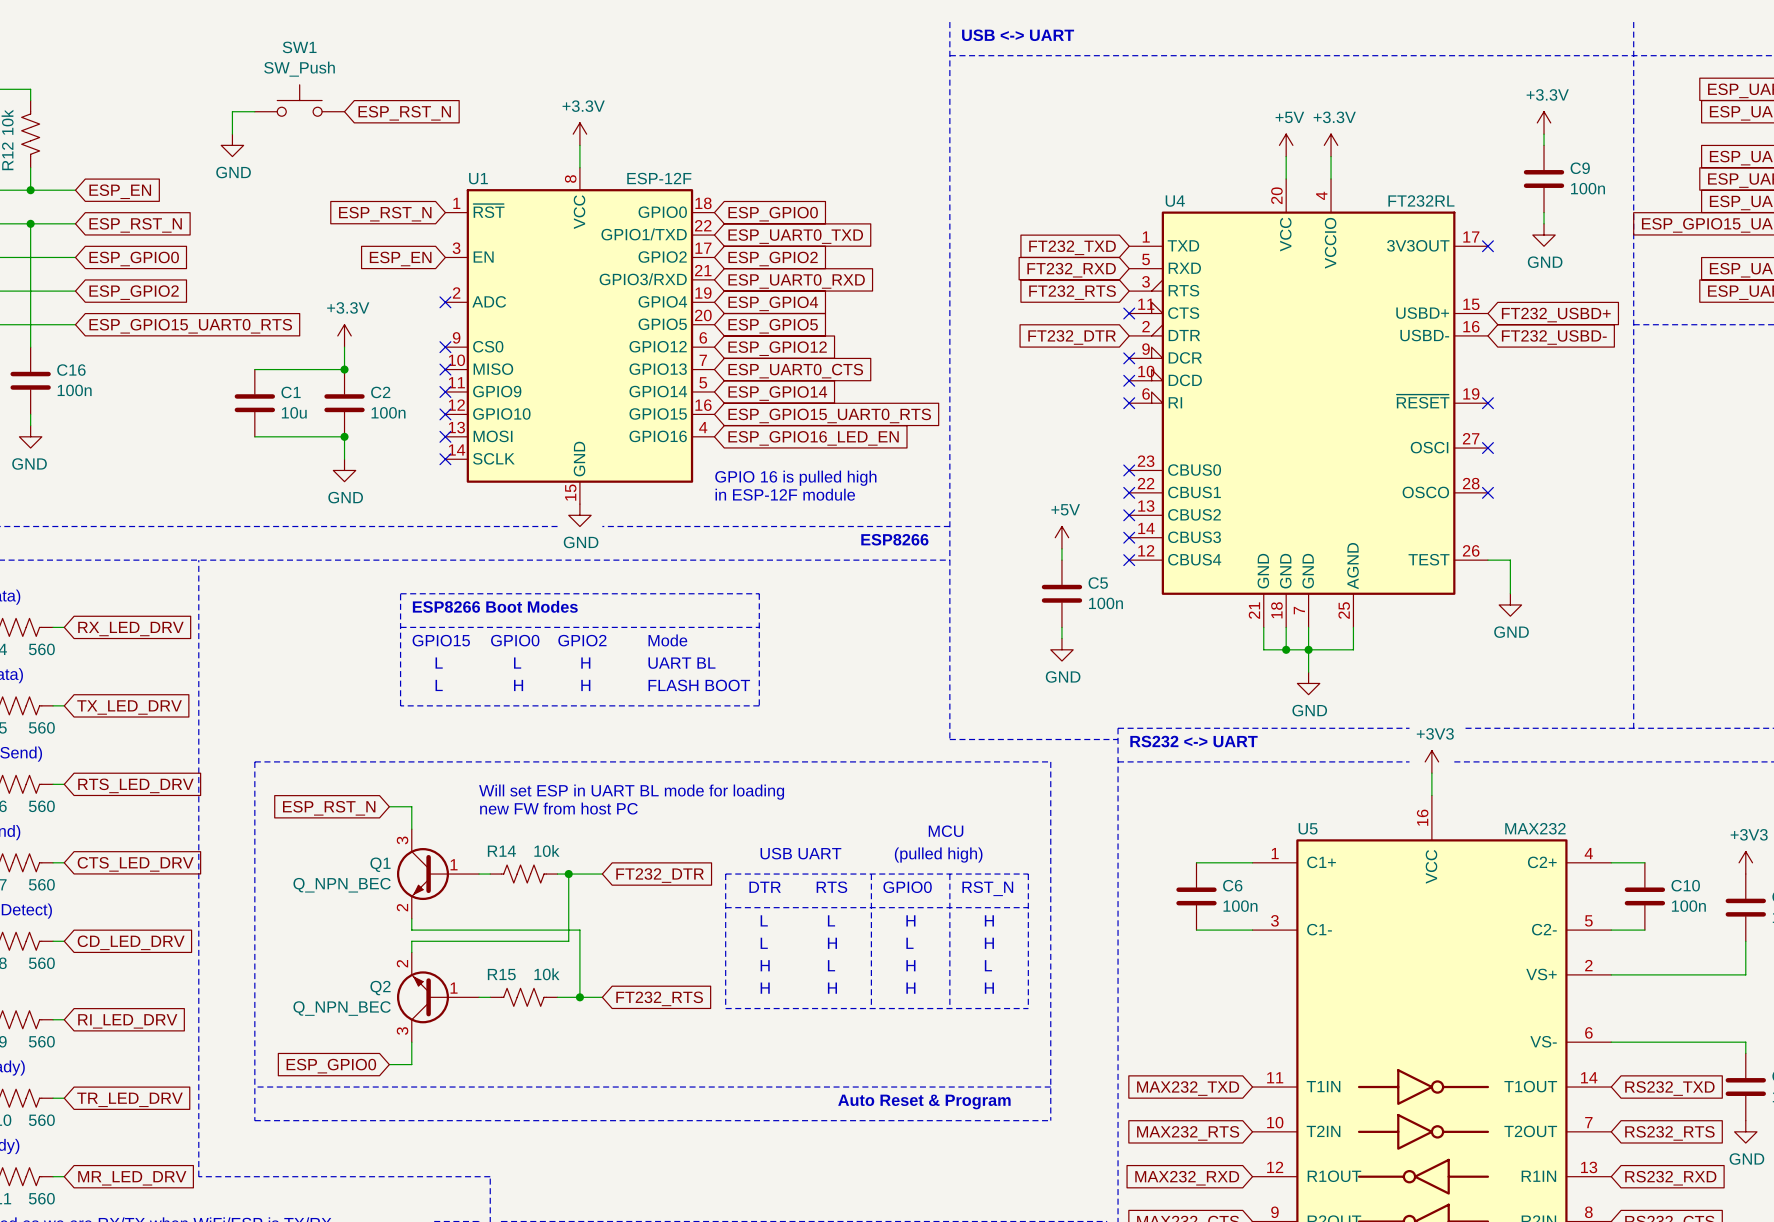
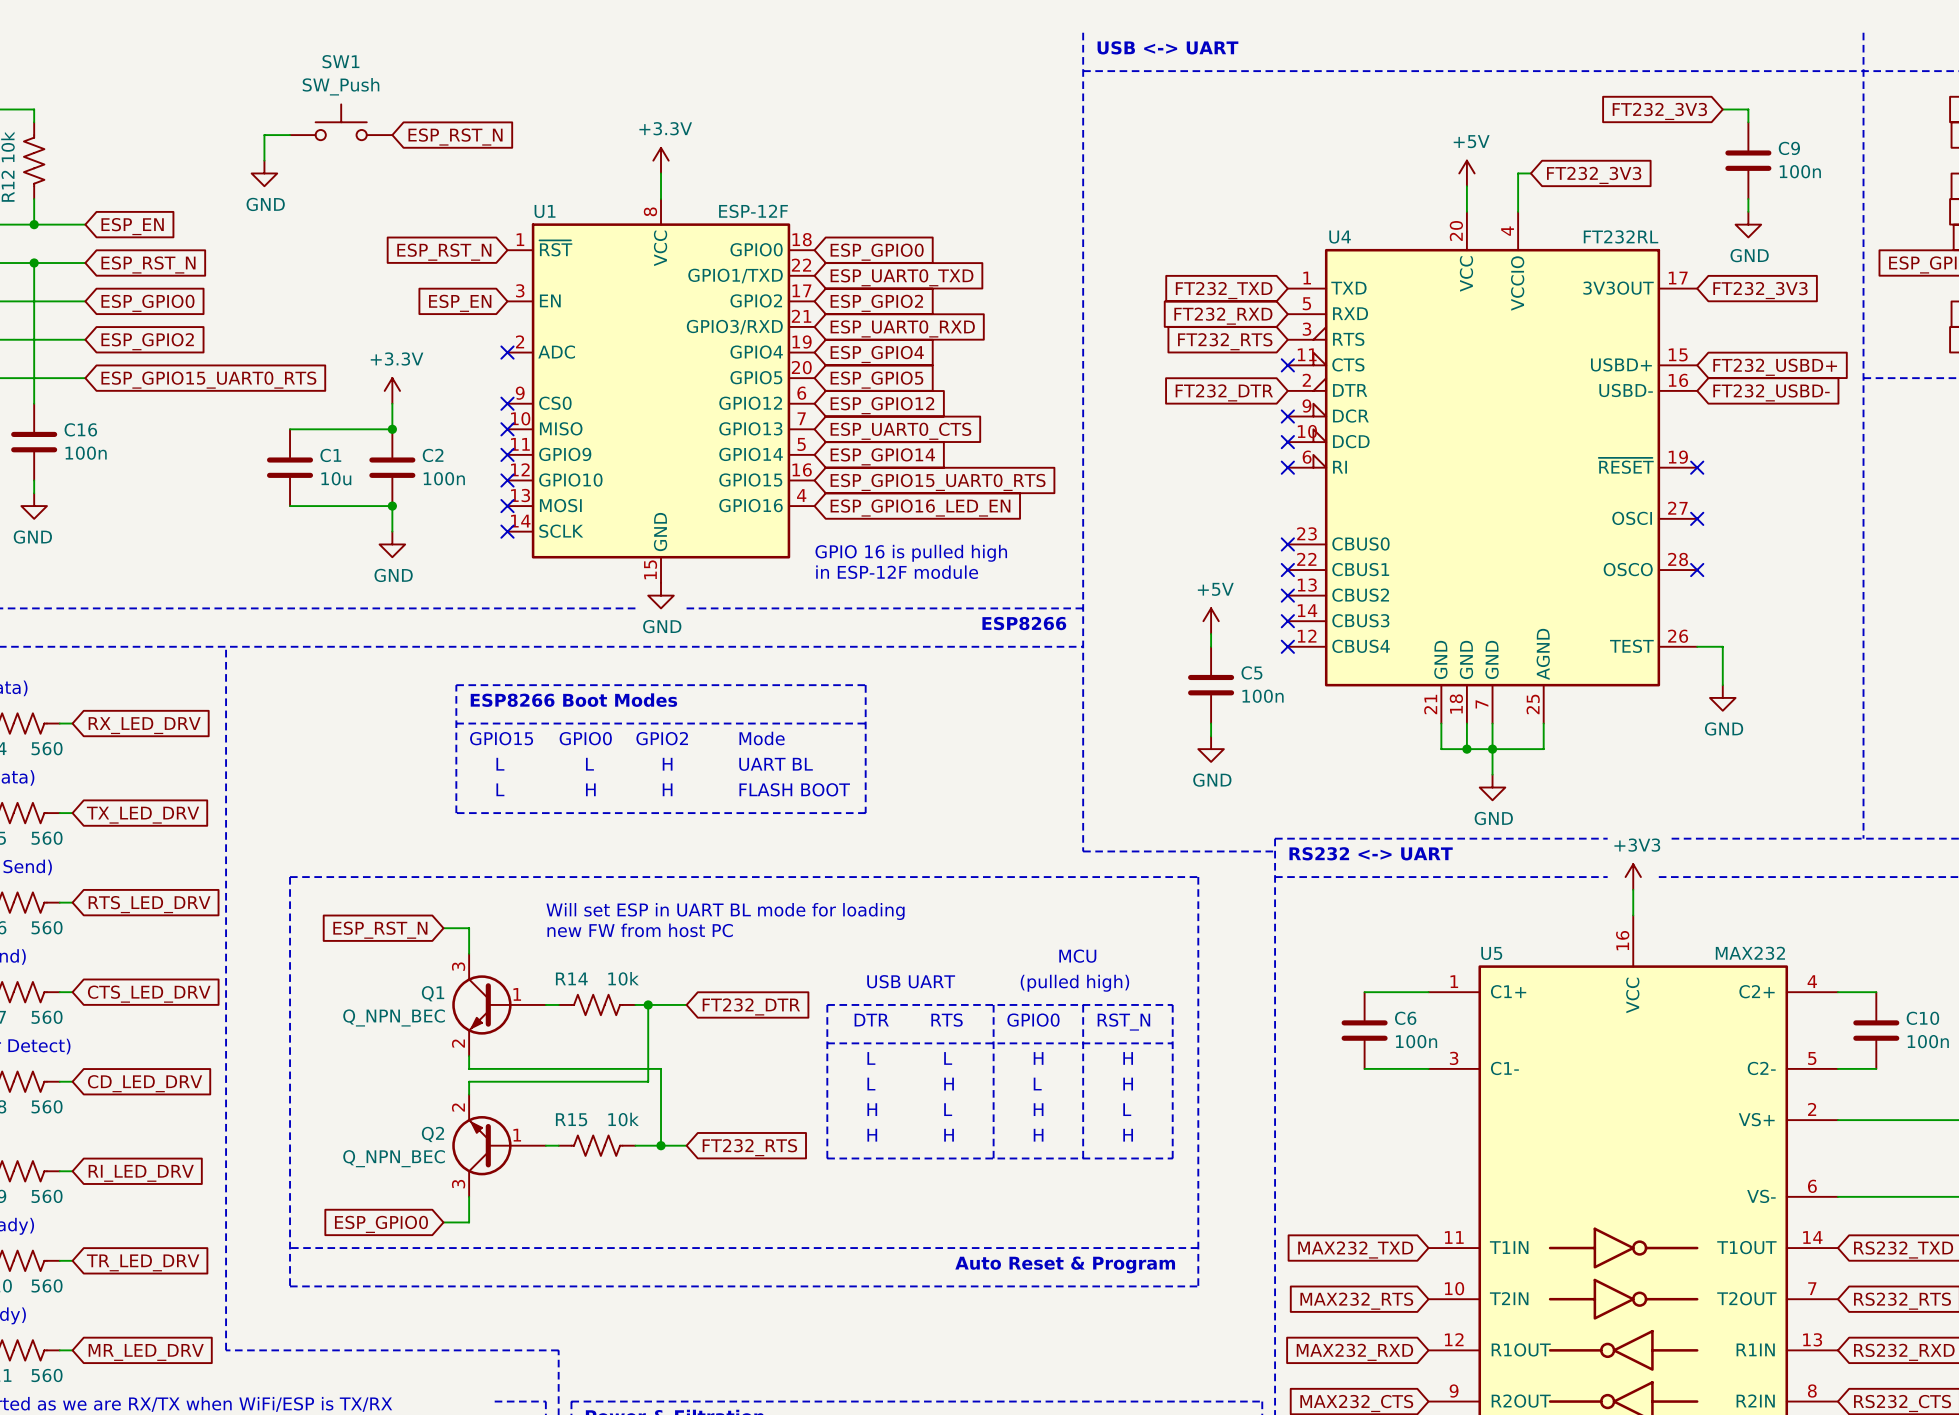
wire: none -> (1722, 109) (1748, 109) (1748, 122)
global label: none -> FT232_3V3 (1659, 111)
power symbol: +3.3V (1544, 122) -> none
wire: (1544, 134) (1544, 145) -> (1748, 199) (1748, 211)
power symbol: +3.3V (1331, 145) -> none
global label: none -> FT232_3V3 (1594, 175)
C9 position: (1544, 178) -> (1748, 160)
wire: (1544, 212) (1544, 223) -> none
power symbol position: GND (1544, 235) -> GND (1748, 224)
no-connect mark: (1487, 246) -> none
global label: none -> FT232_3V3 (1760, 290)

